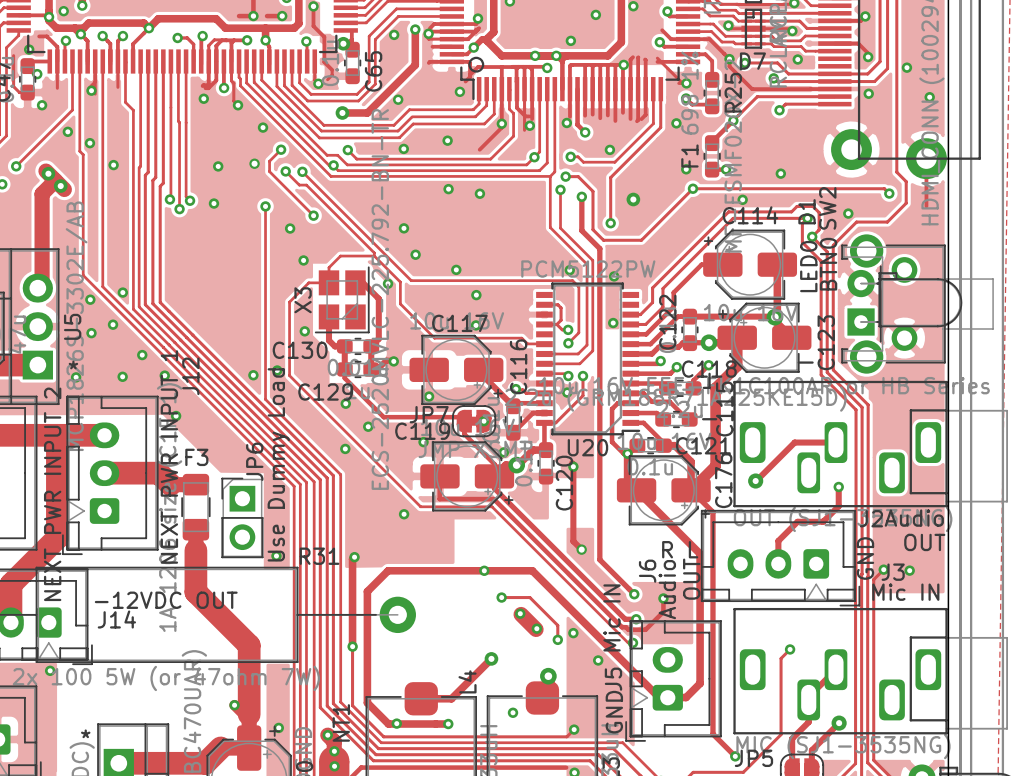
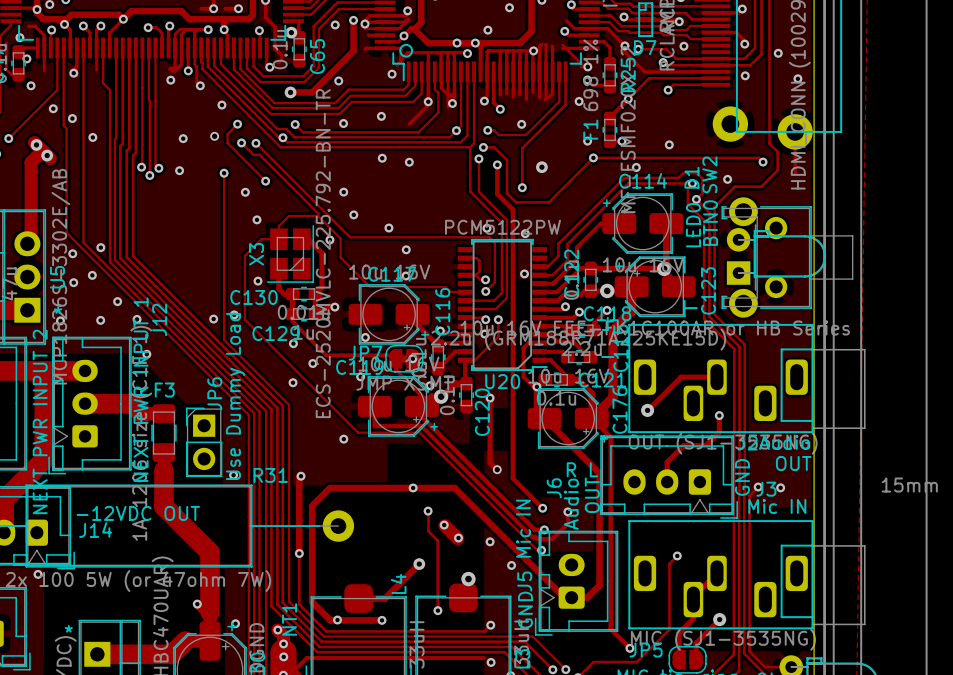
track: (501, 597) (529, 597) (557, 625) (557, 639) -> (428, 511) (428, 531) (437, 540) (437, 610)
via: (557, 639) -> none

